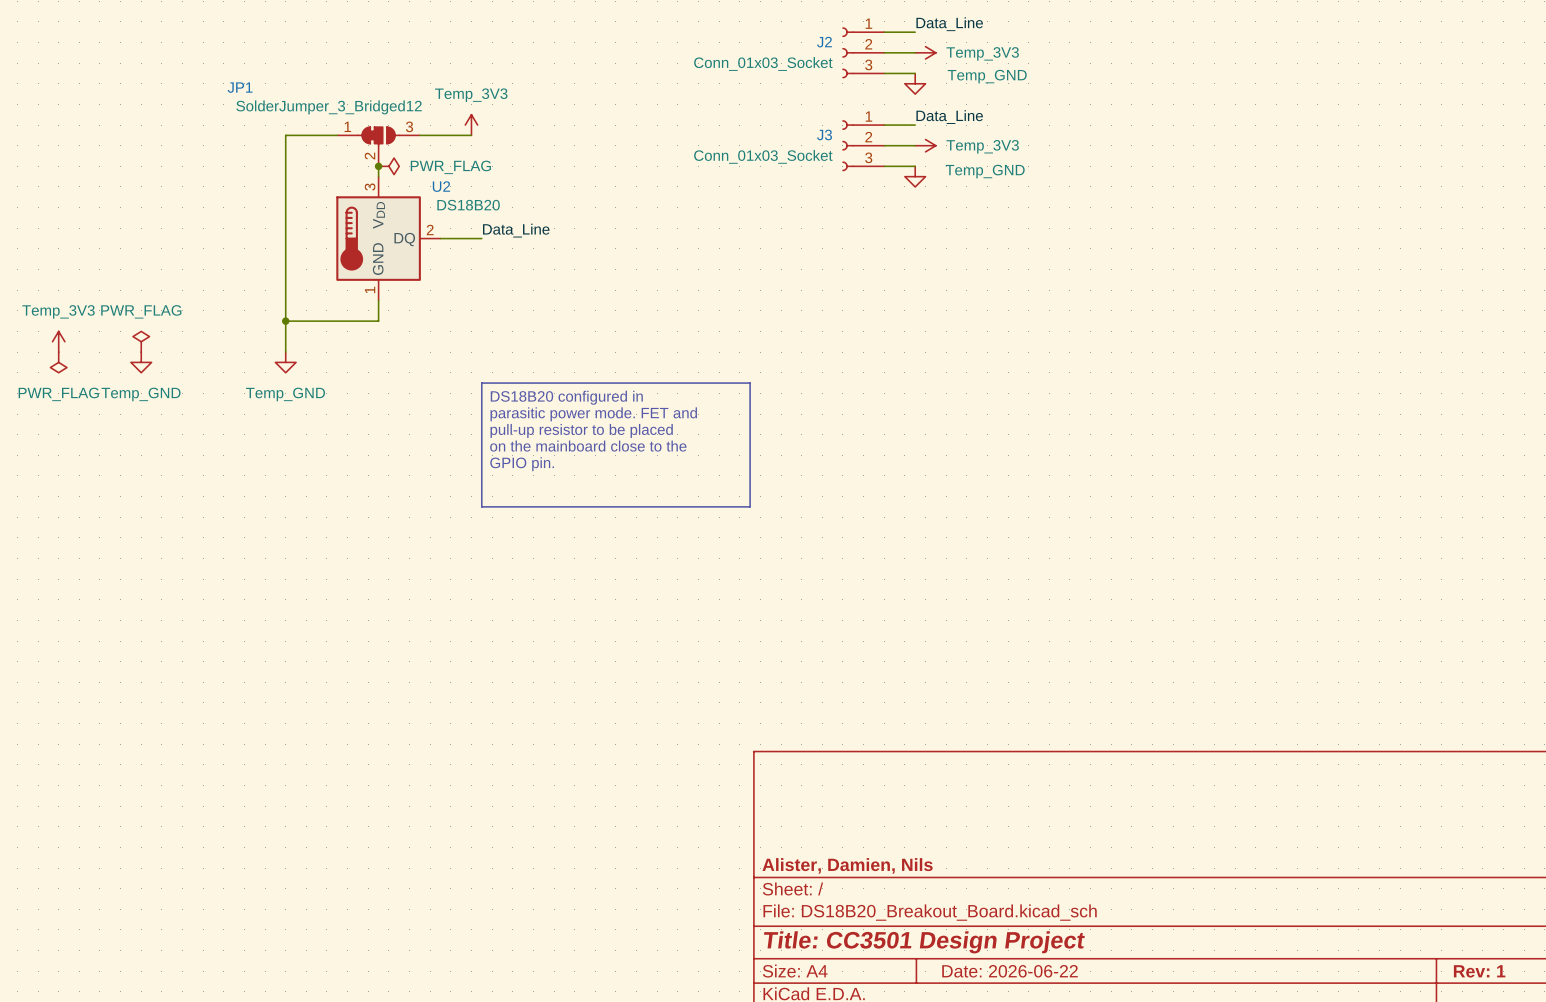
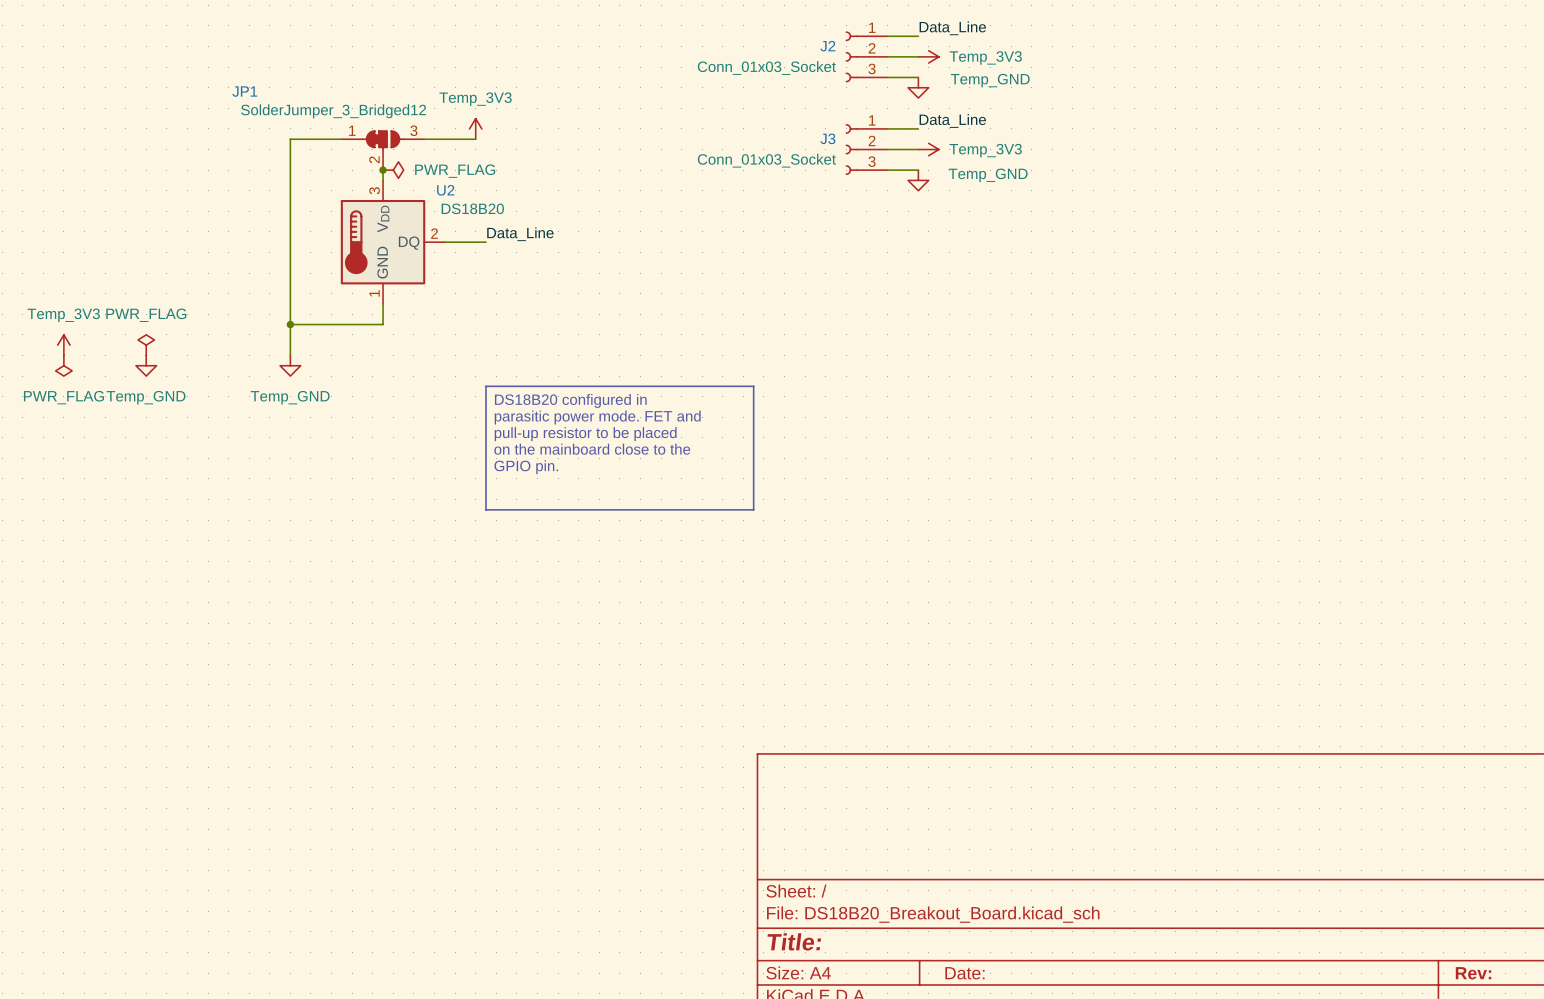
title block: Alister, Damien, Nils (847, 865) -> none
title block: Title: CC3501 Design Project (924, 942) -> Title: (794, 941)
title block: Date: 2026-06-22 (1010, 971) -> Date: (964, 973)
title block: Rev: 1 (1479, 971) -> Rev: (1473, 973)

